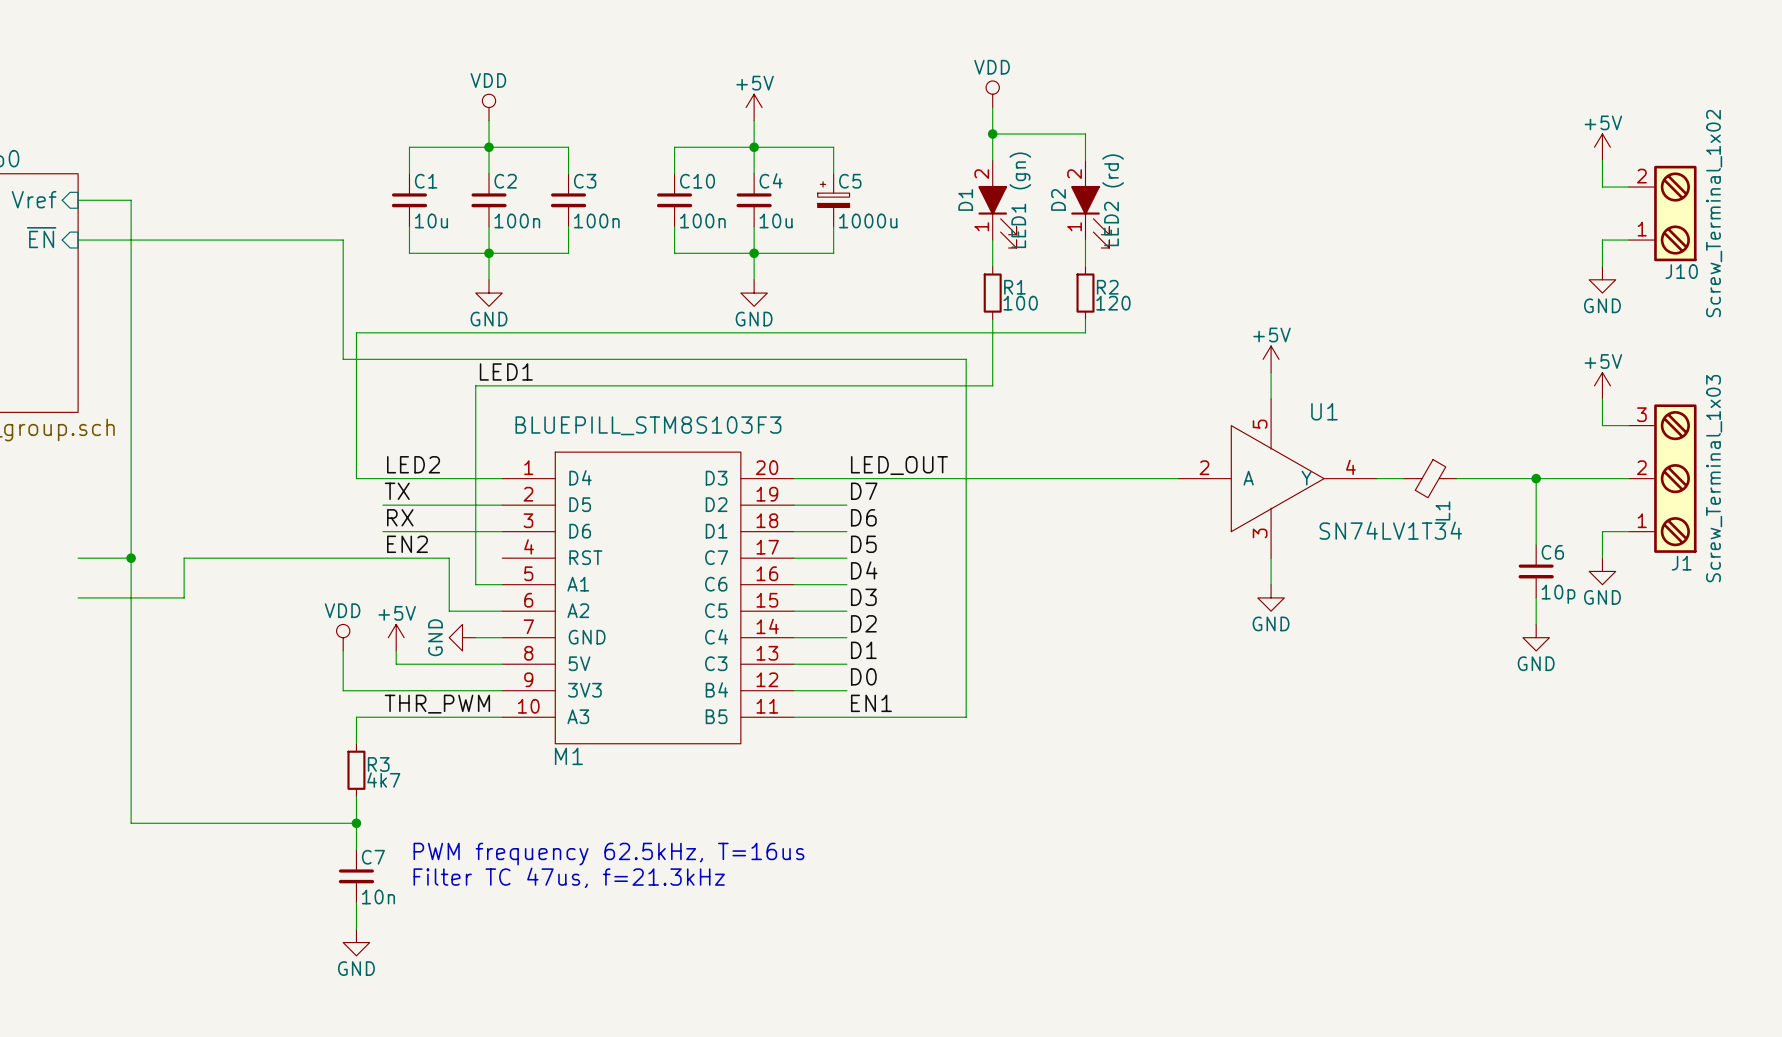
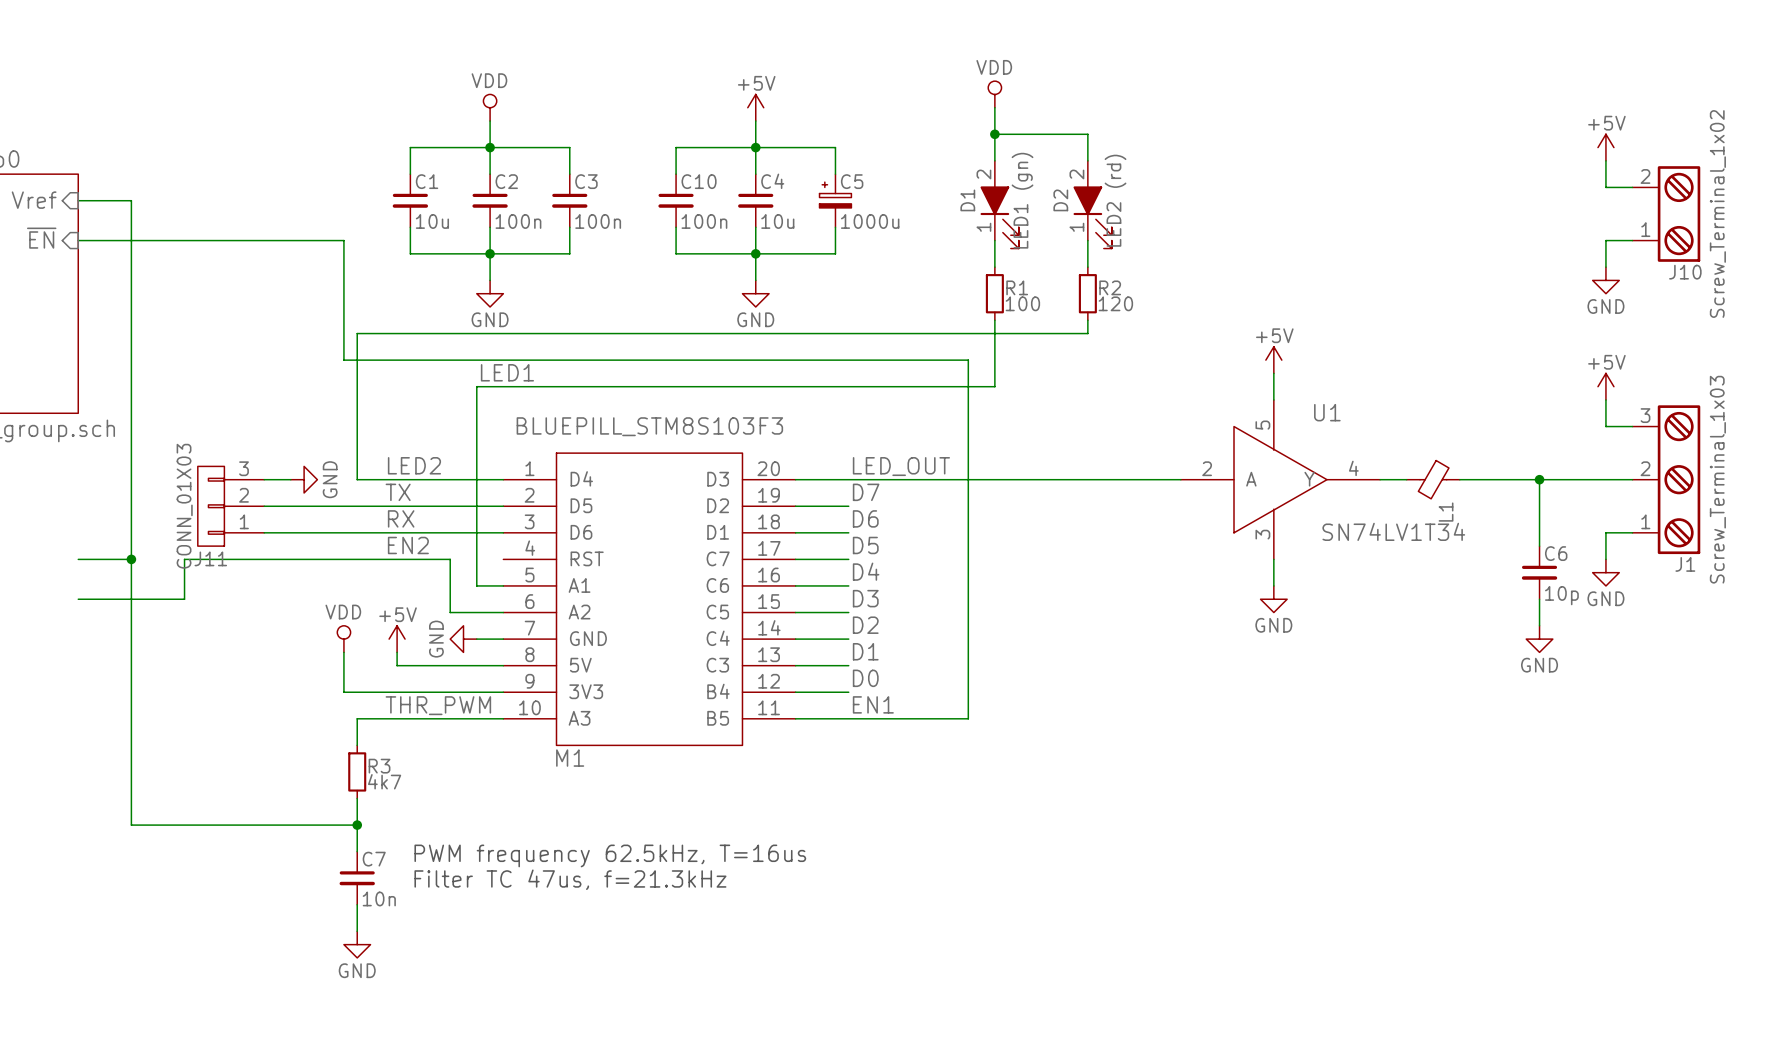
wire: none -> (264, 479) (290, 479)
power symbol: none -> GND (304, 479)
J11: none -> CONN_01X03 (231, 506)
wire: none -> (264, 506) (383, 506)
wire: none -> (264, 532) (383, 532)

